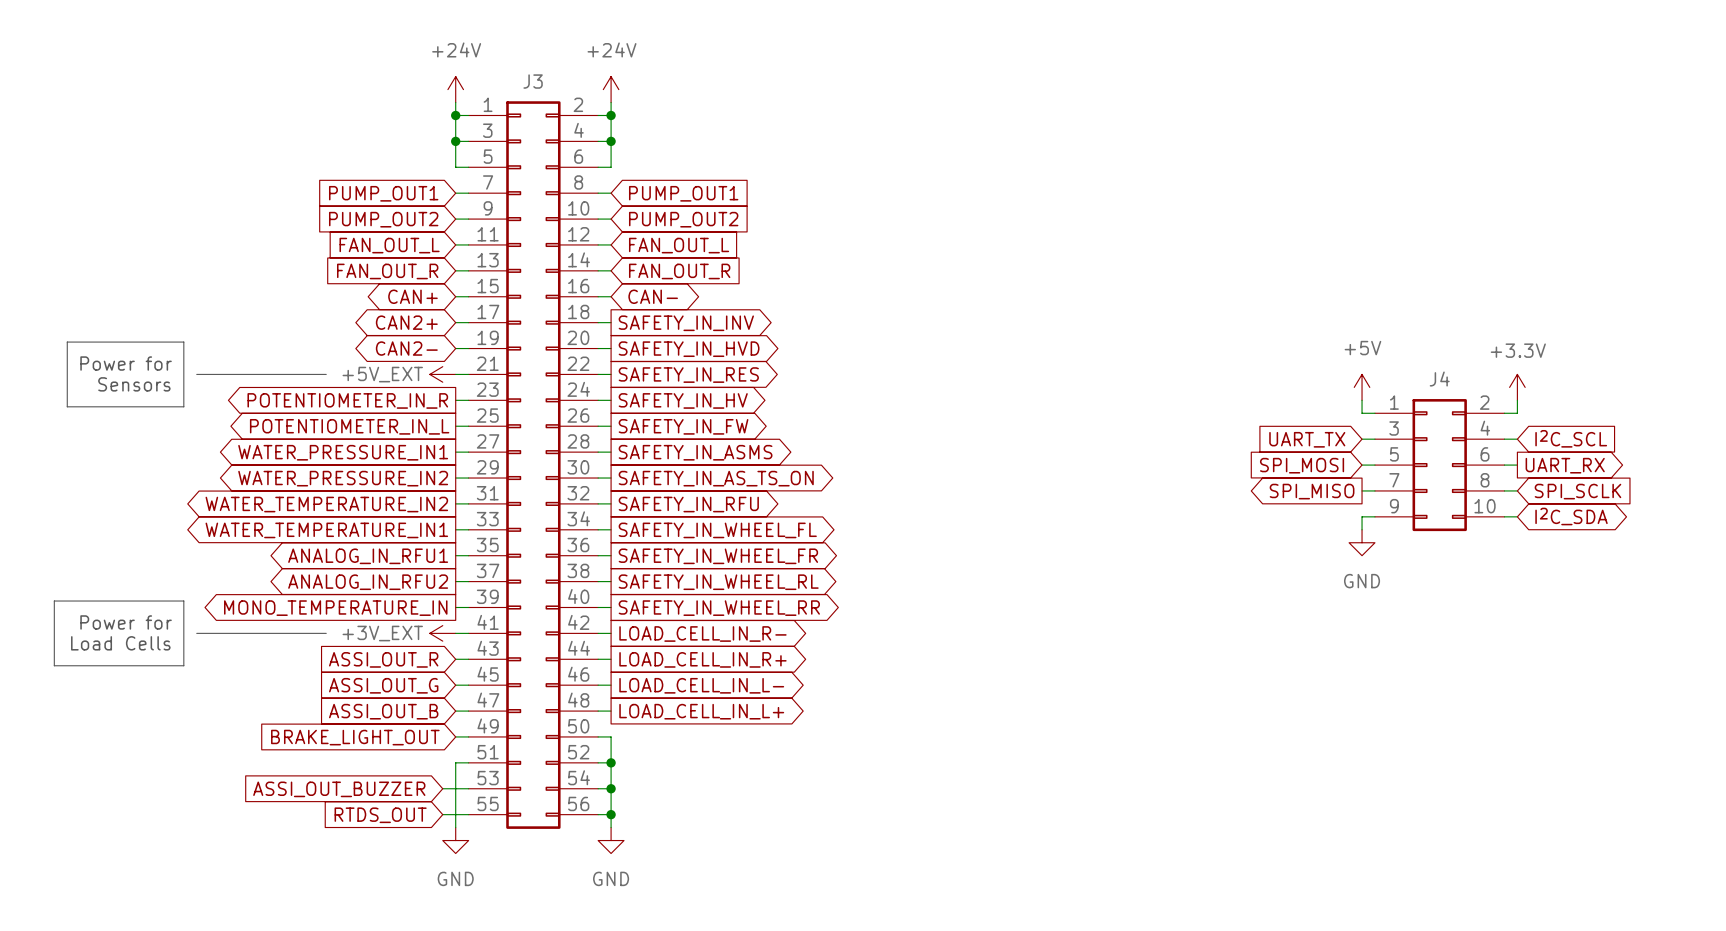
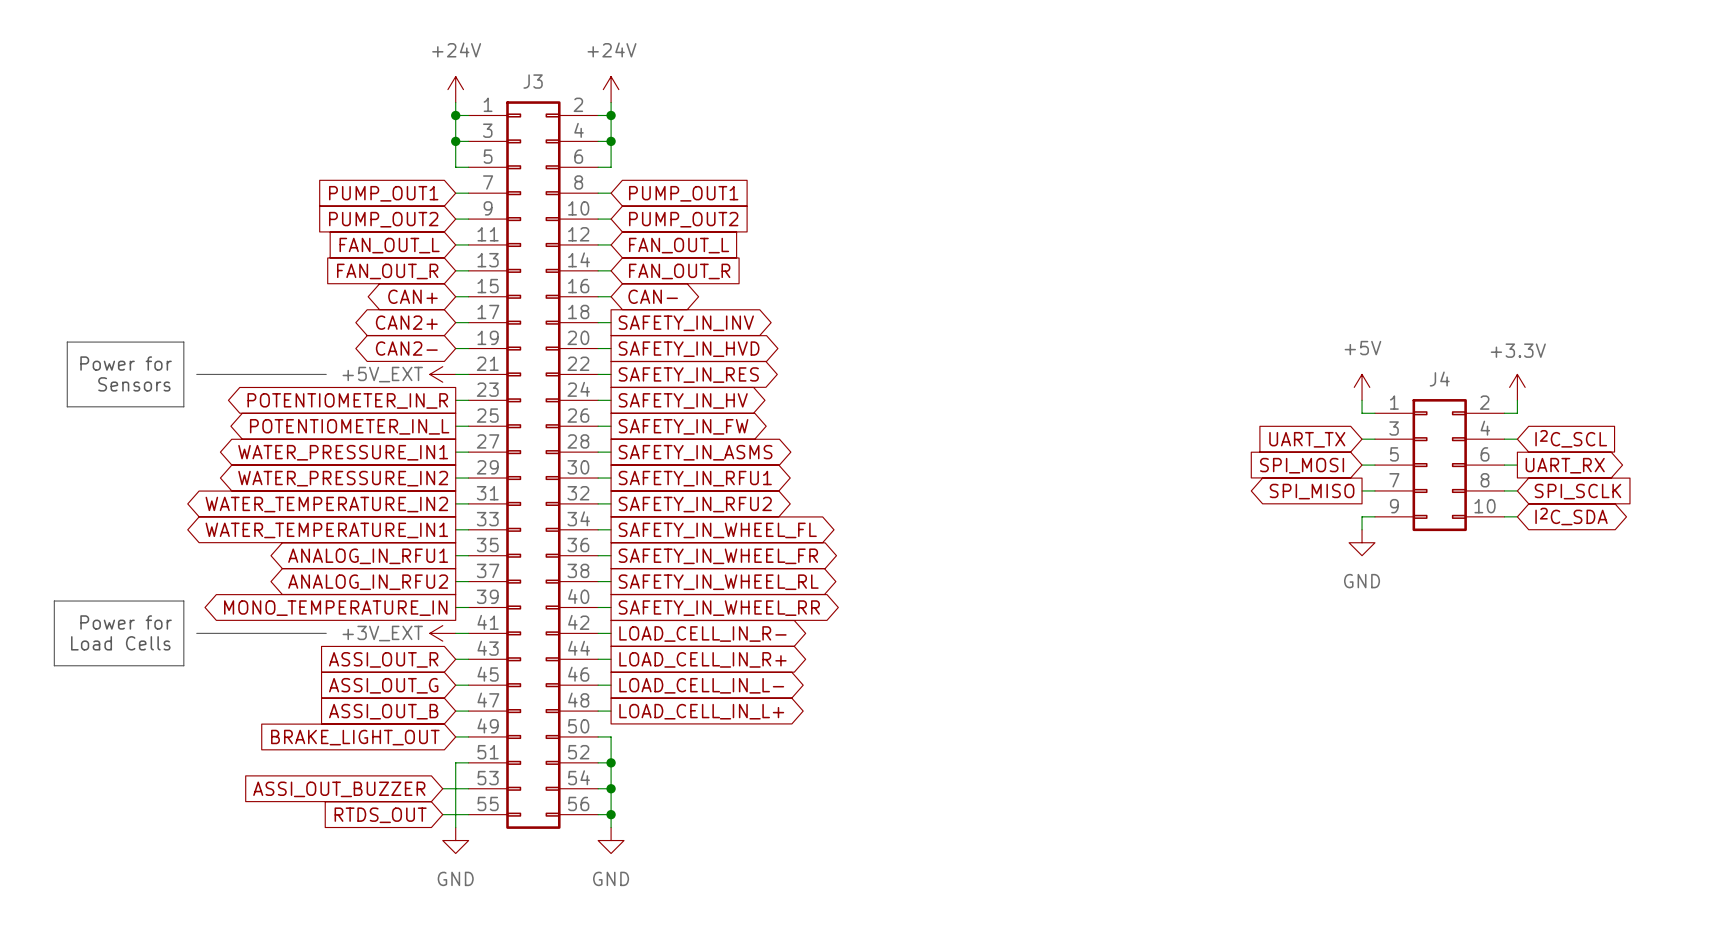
global label: SAFETY_IN_AS_TS_ON (716, 478) -> SAFETY_IN_RFU1 (695, 478)
global label: SAFETY_IN_RFU (688, 504) -> SAFETY_IN_RFU2 (695, 504)

